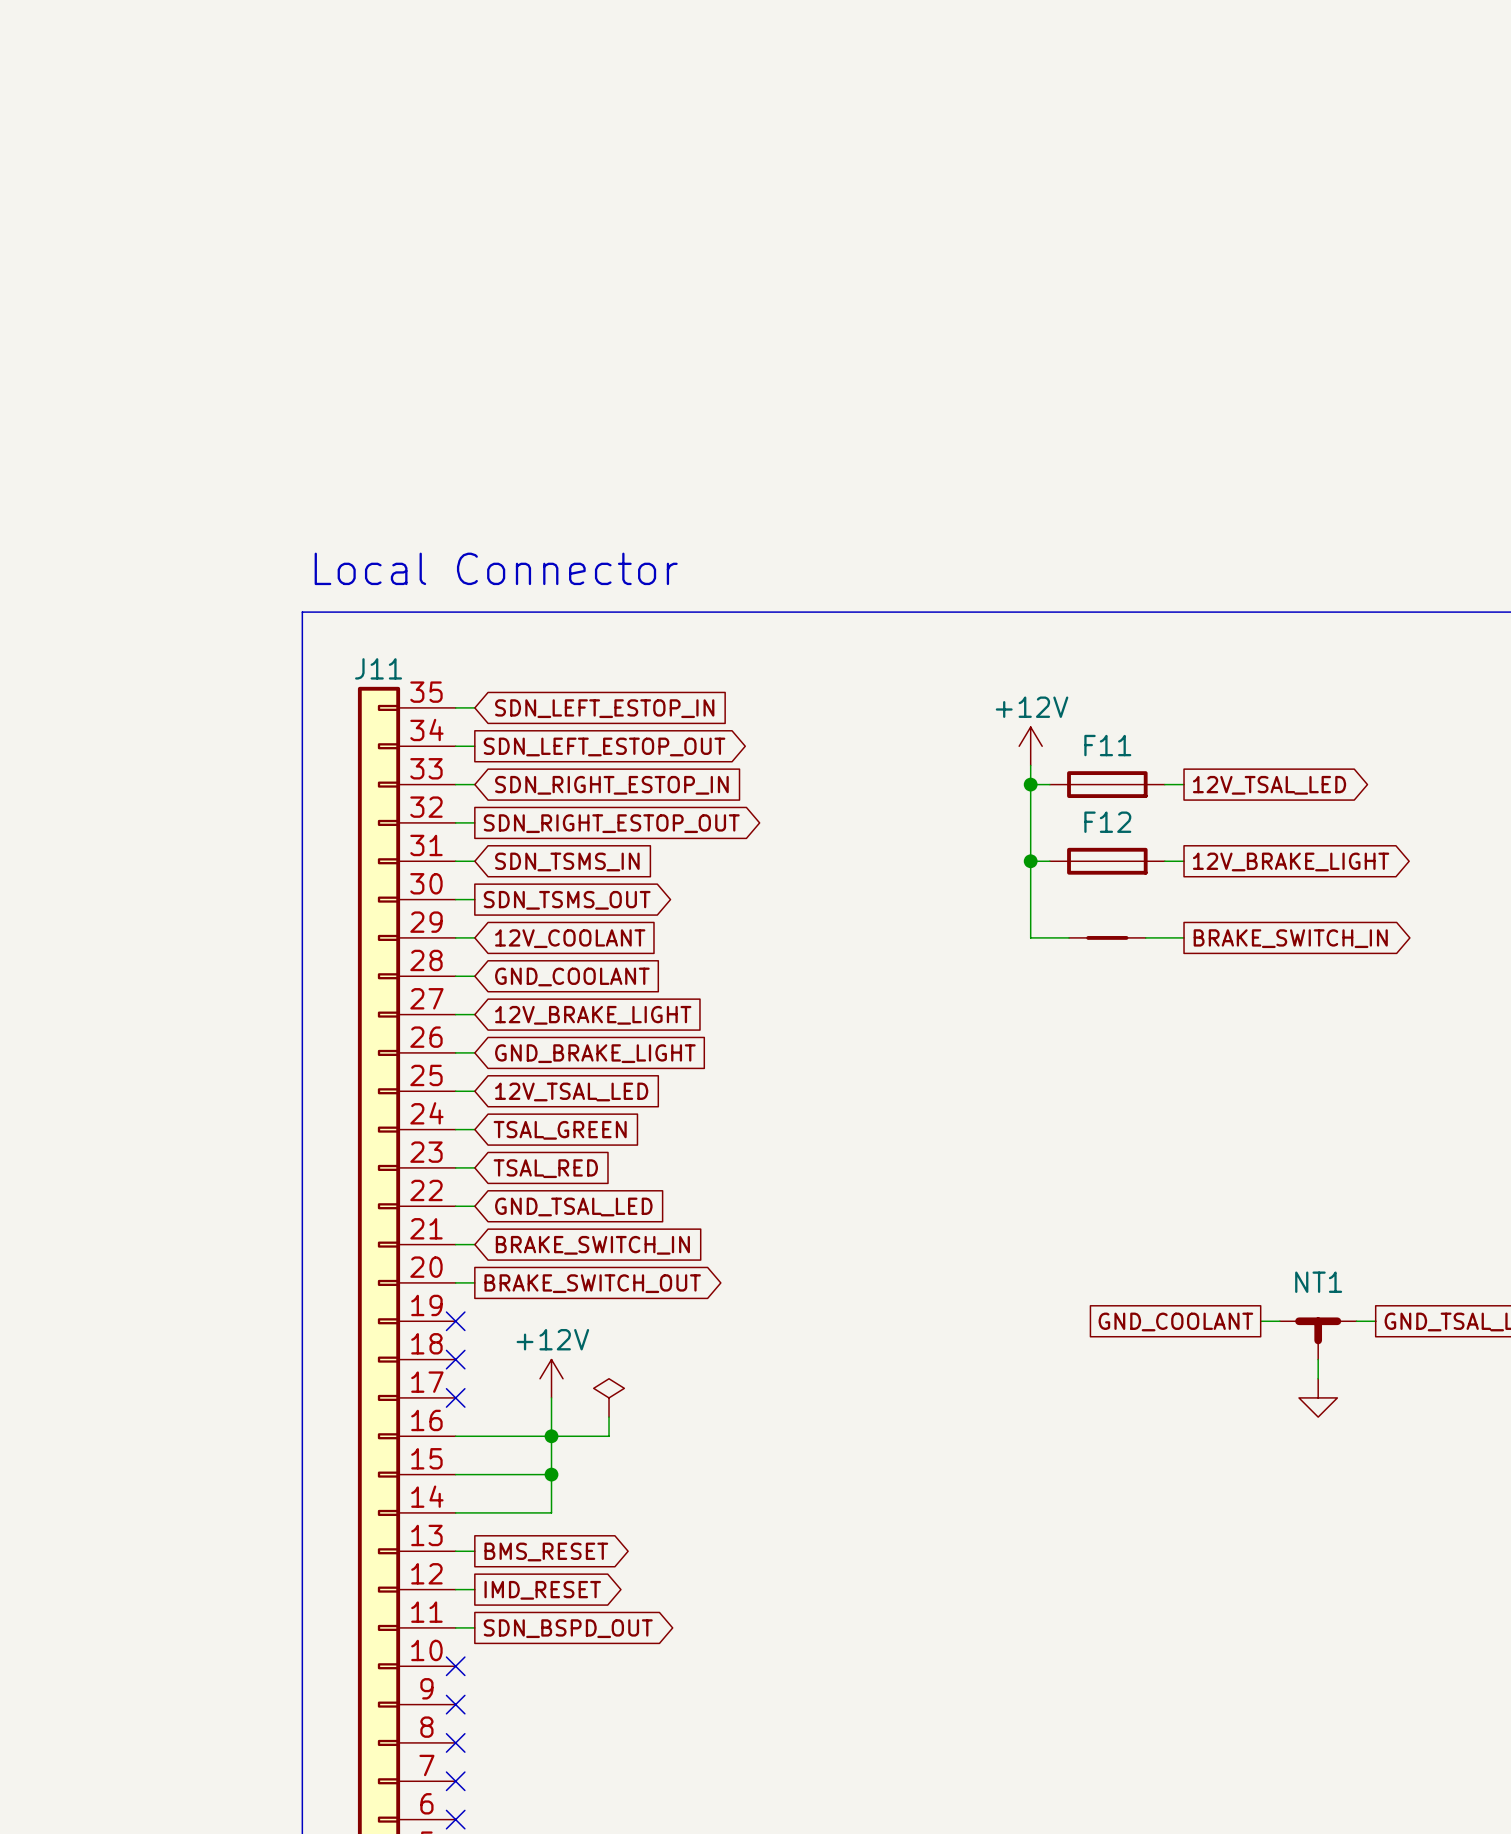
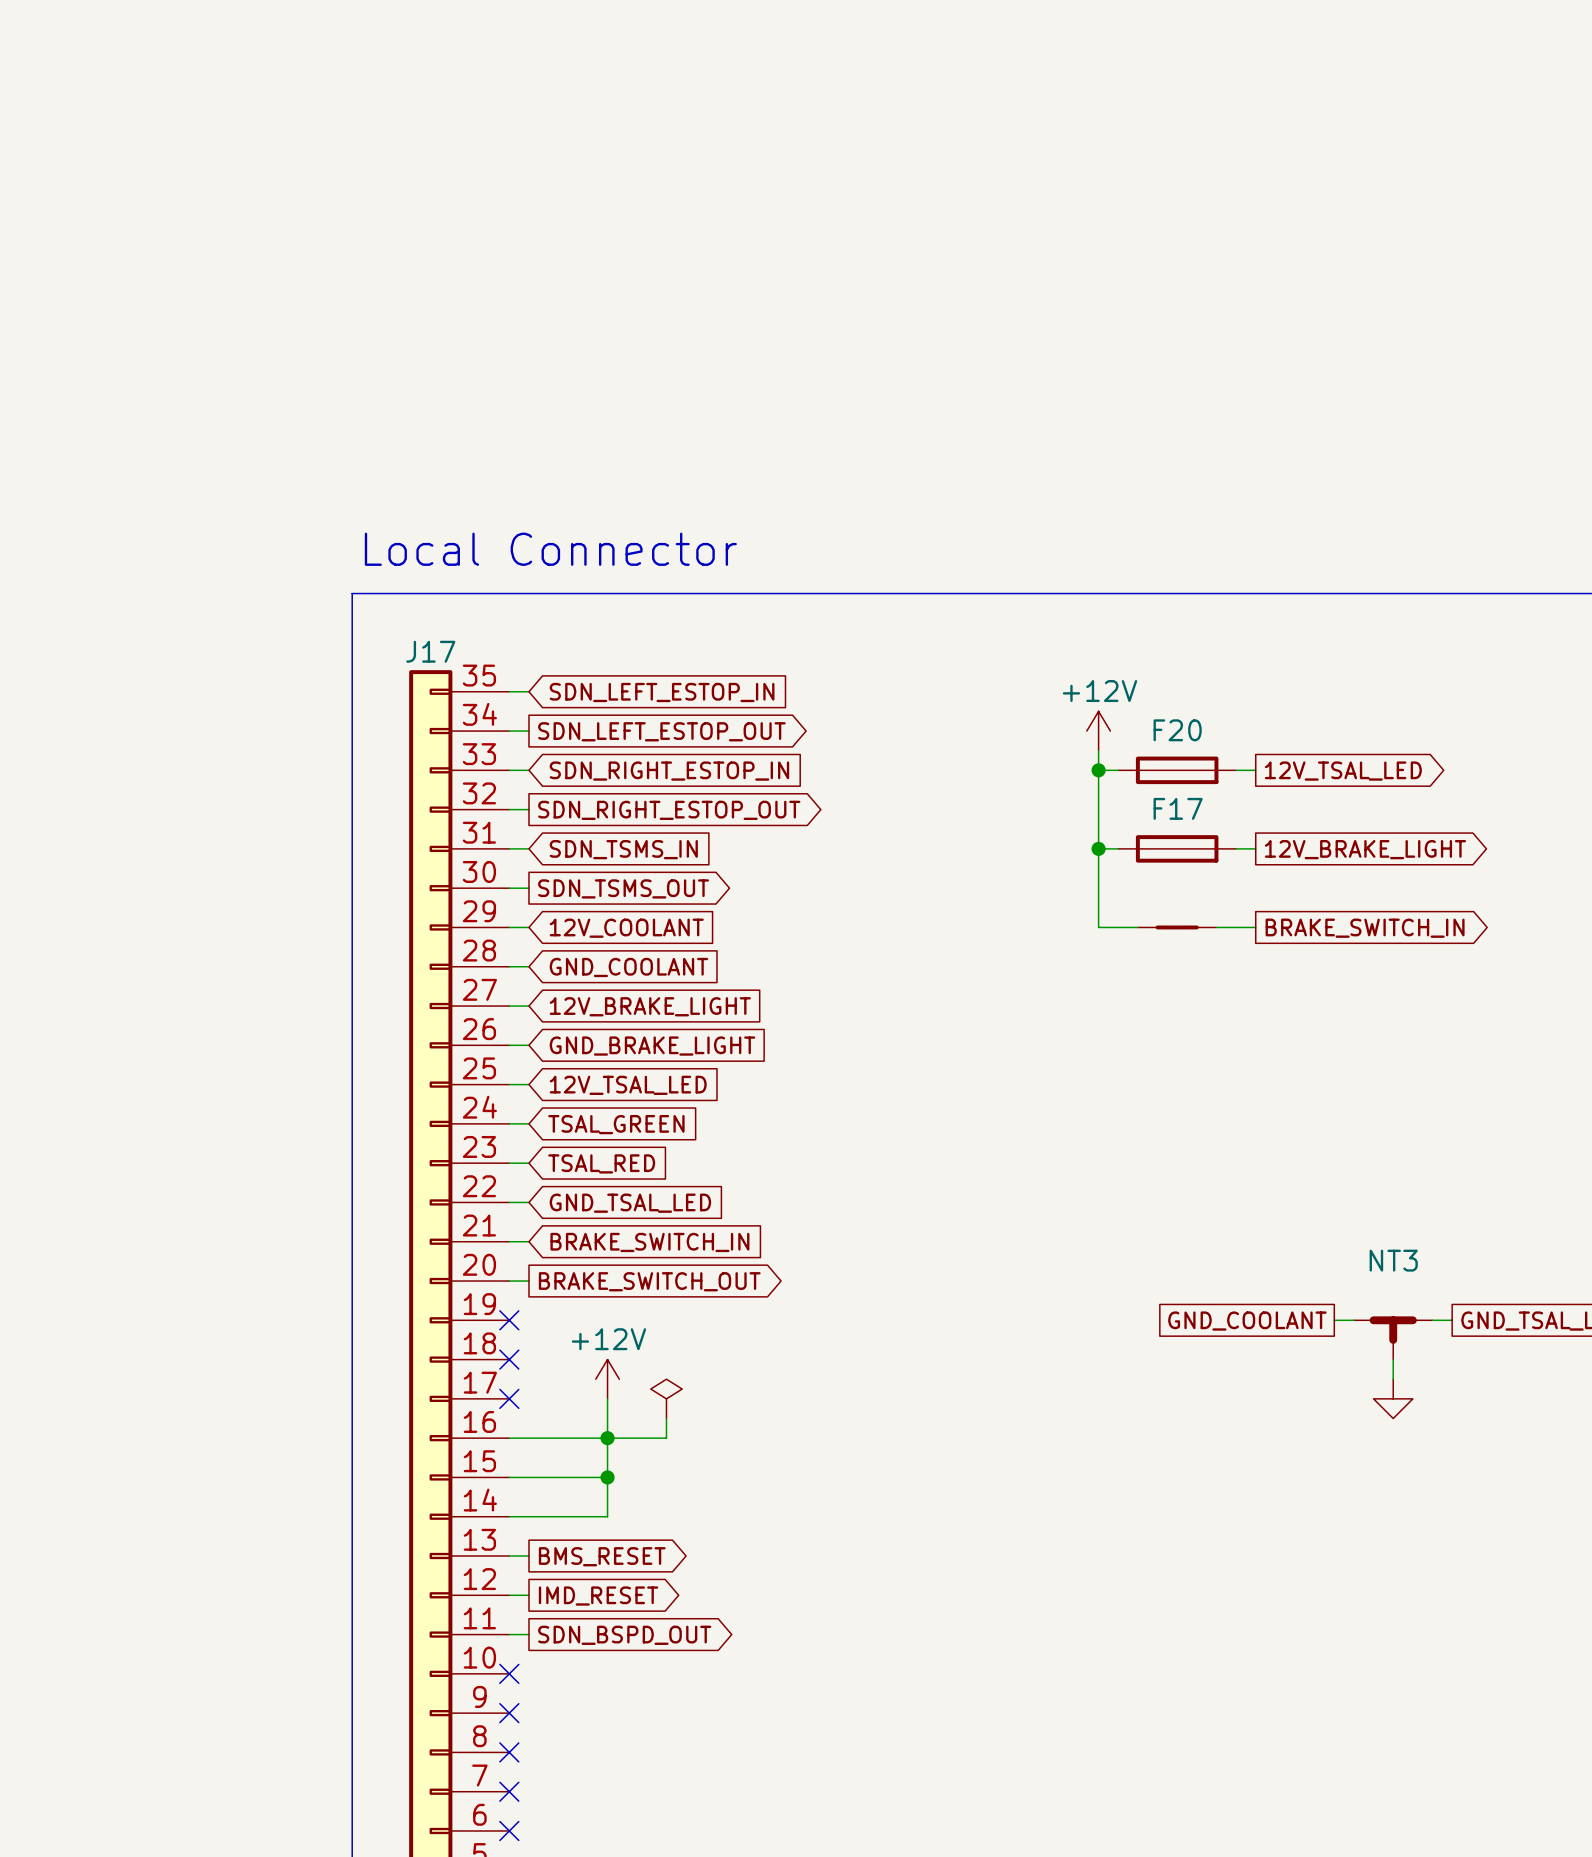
J11 name: J11 (378, 668) -> J17 (430, 651)
F11 name: F11 (1107, 745) -> F20 (1177, 730)
F12 name: F12 (1107, 822) -> F17 (1178, 808)
NT1 name: NT1 (1318, 1282) -> NT3 (1393, 1260)

